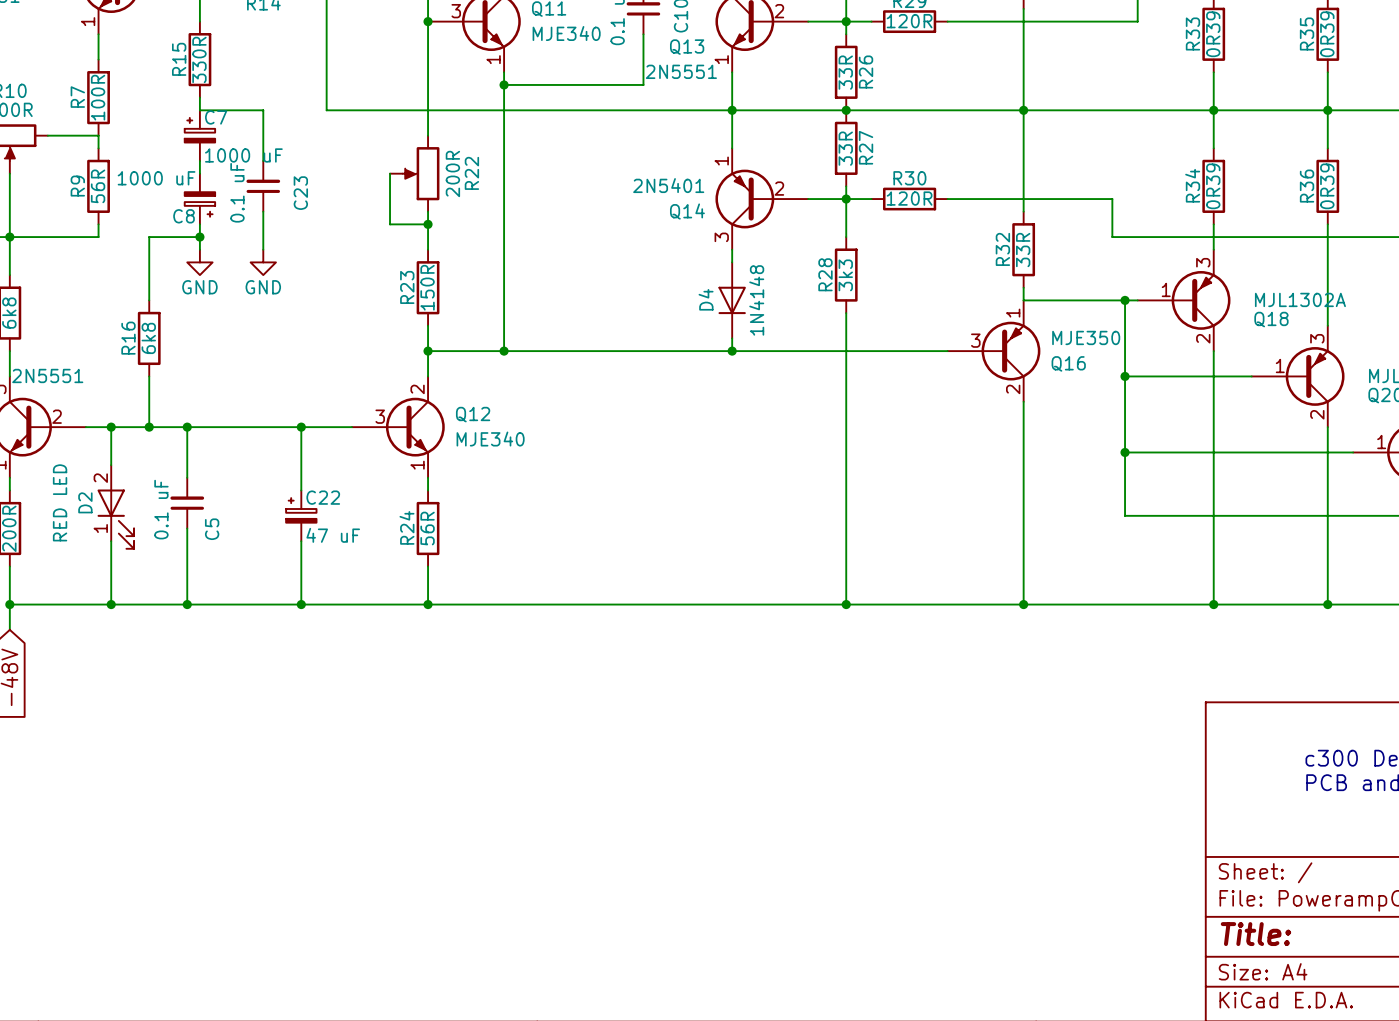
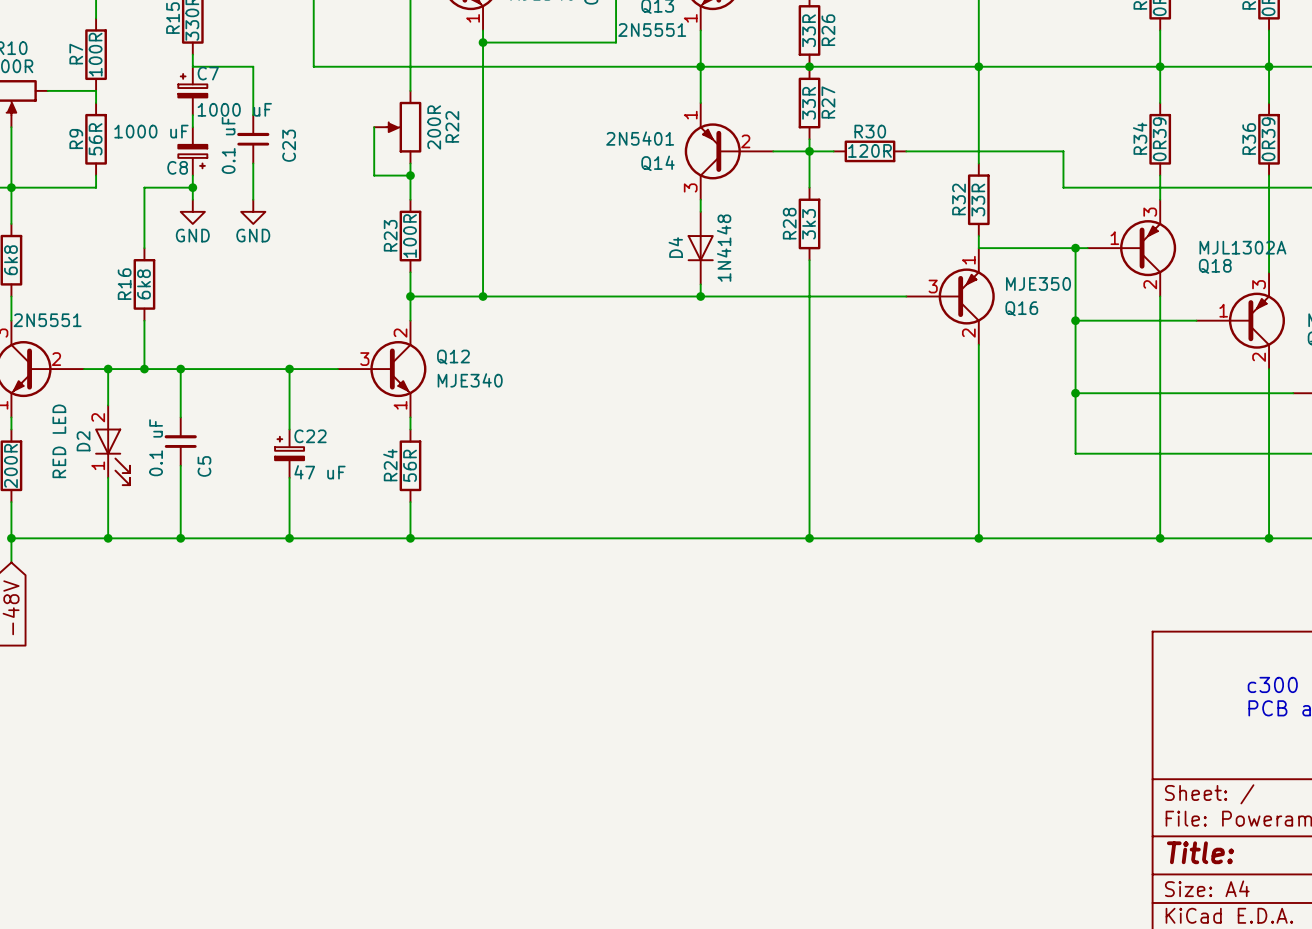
R23 value: 150R (427, 287) -> 100R (410, 236)

